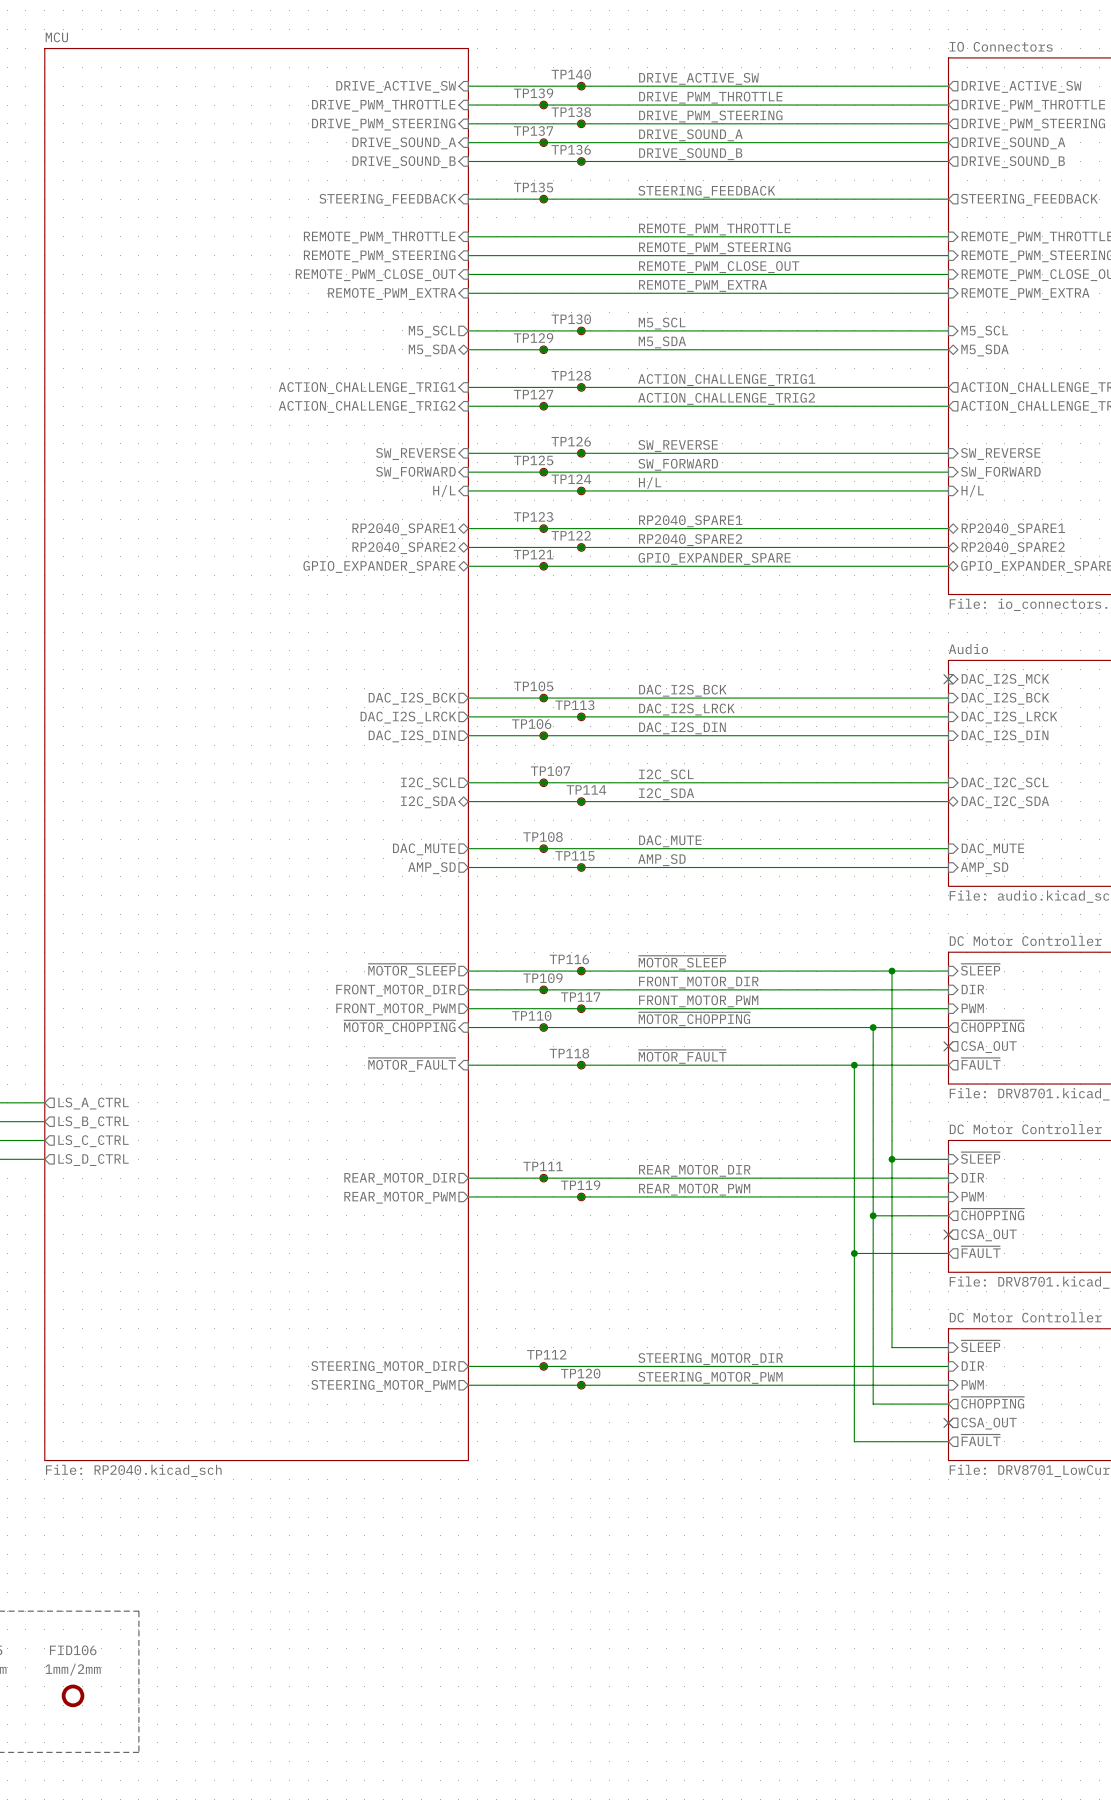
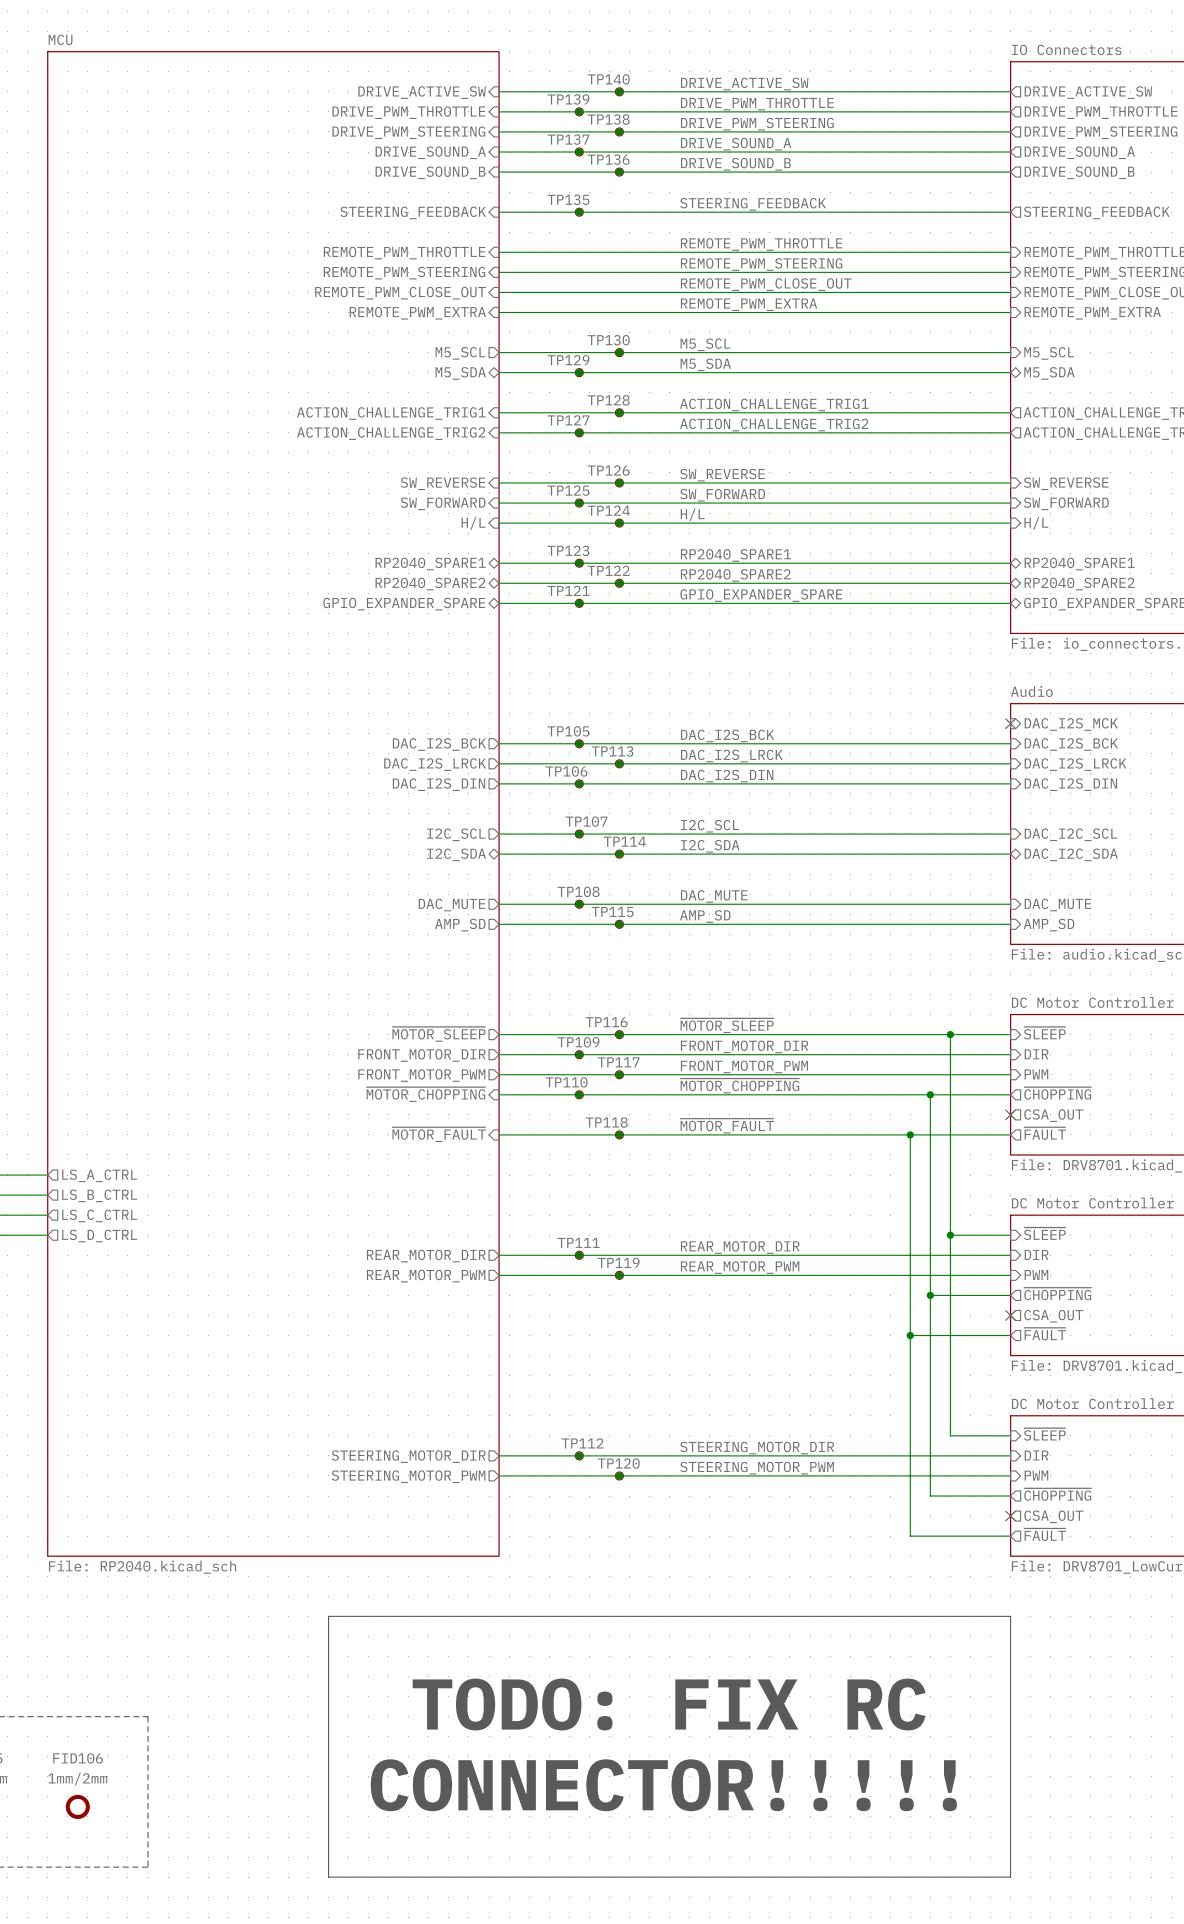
line: none -> (328, 1616) (1010, 1616) (1010, 1877) (328, 1877) (328, 1616)
text: none -> TODO: FIX RC (669, 1704)
text: none -> CONNECTOR!!!!! (663, 1785)

